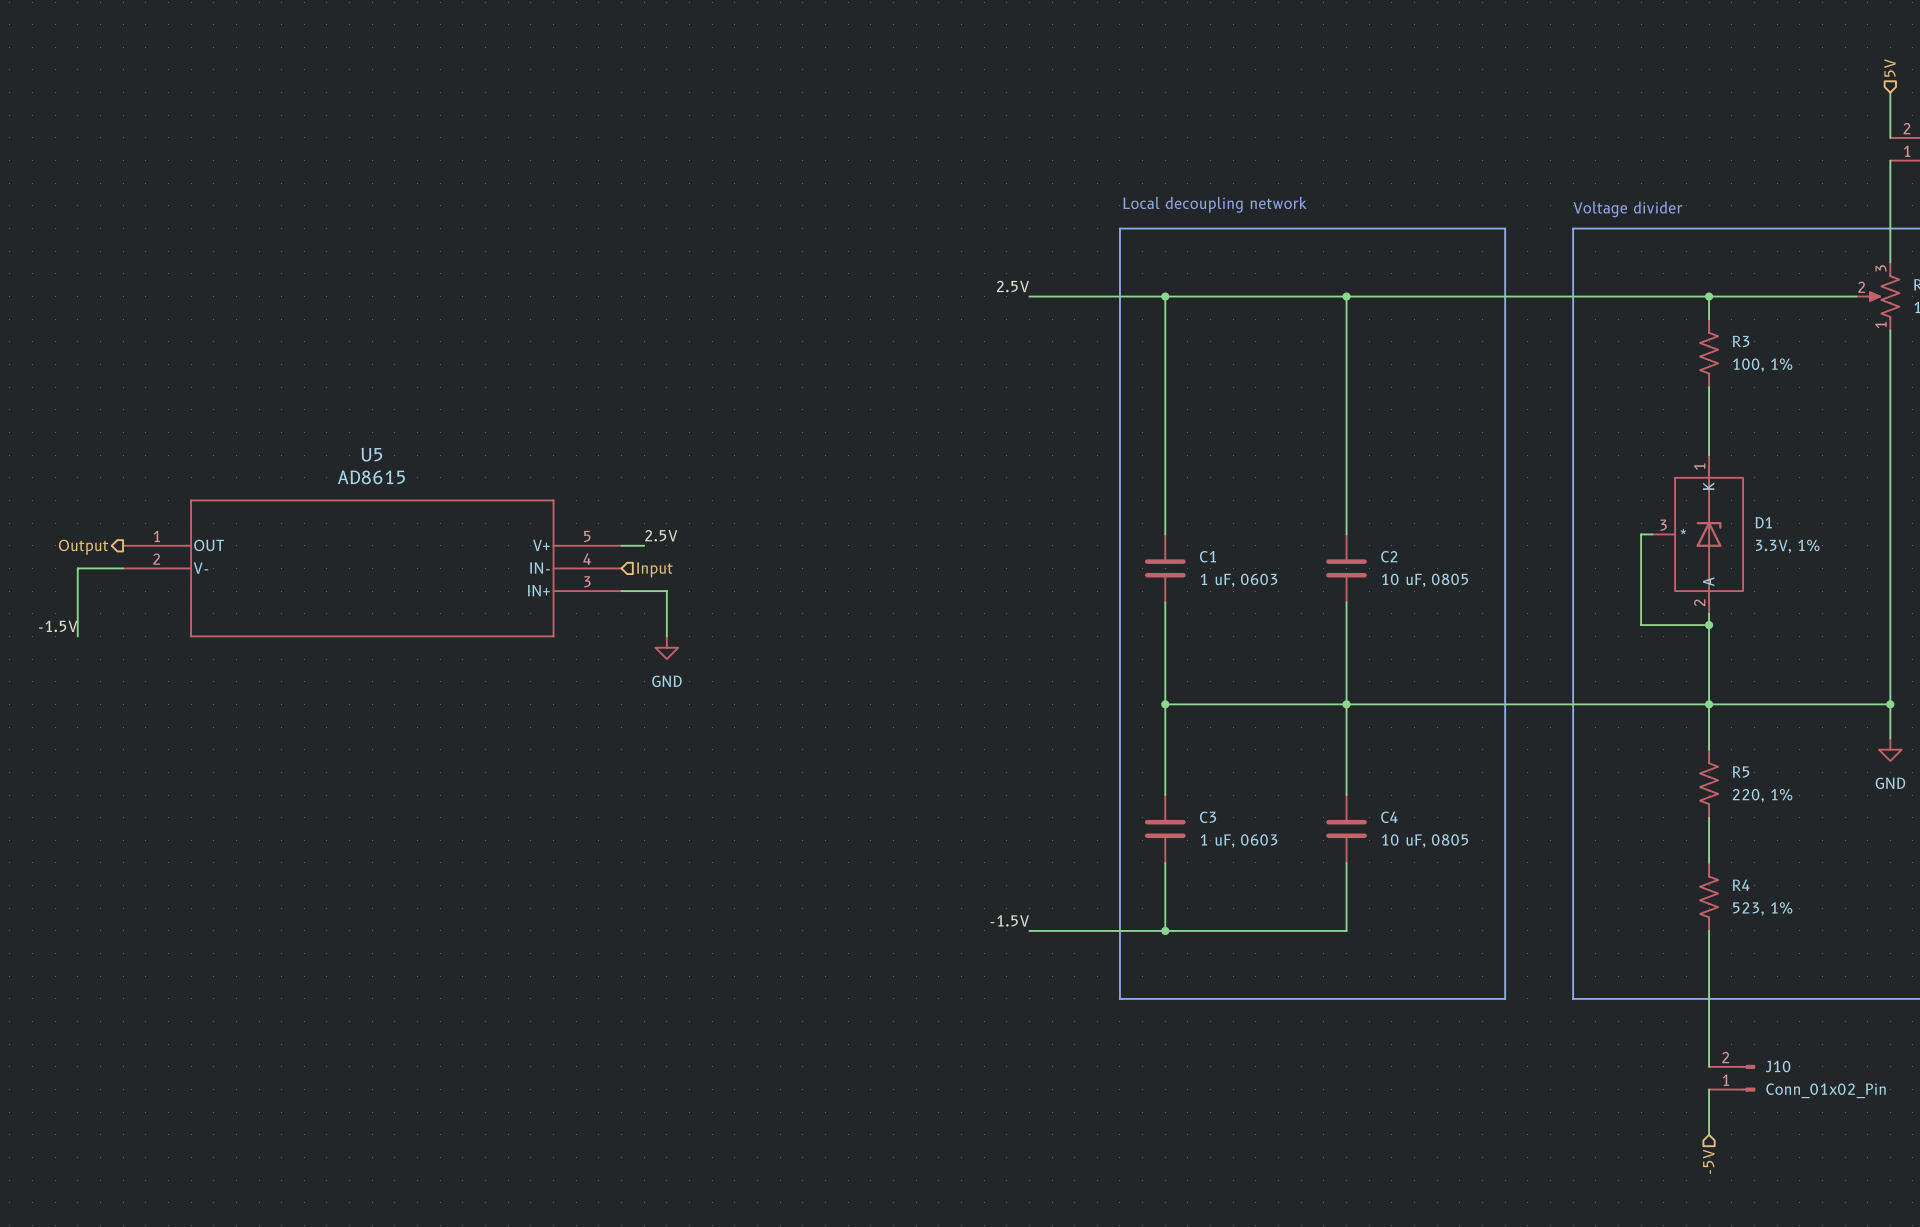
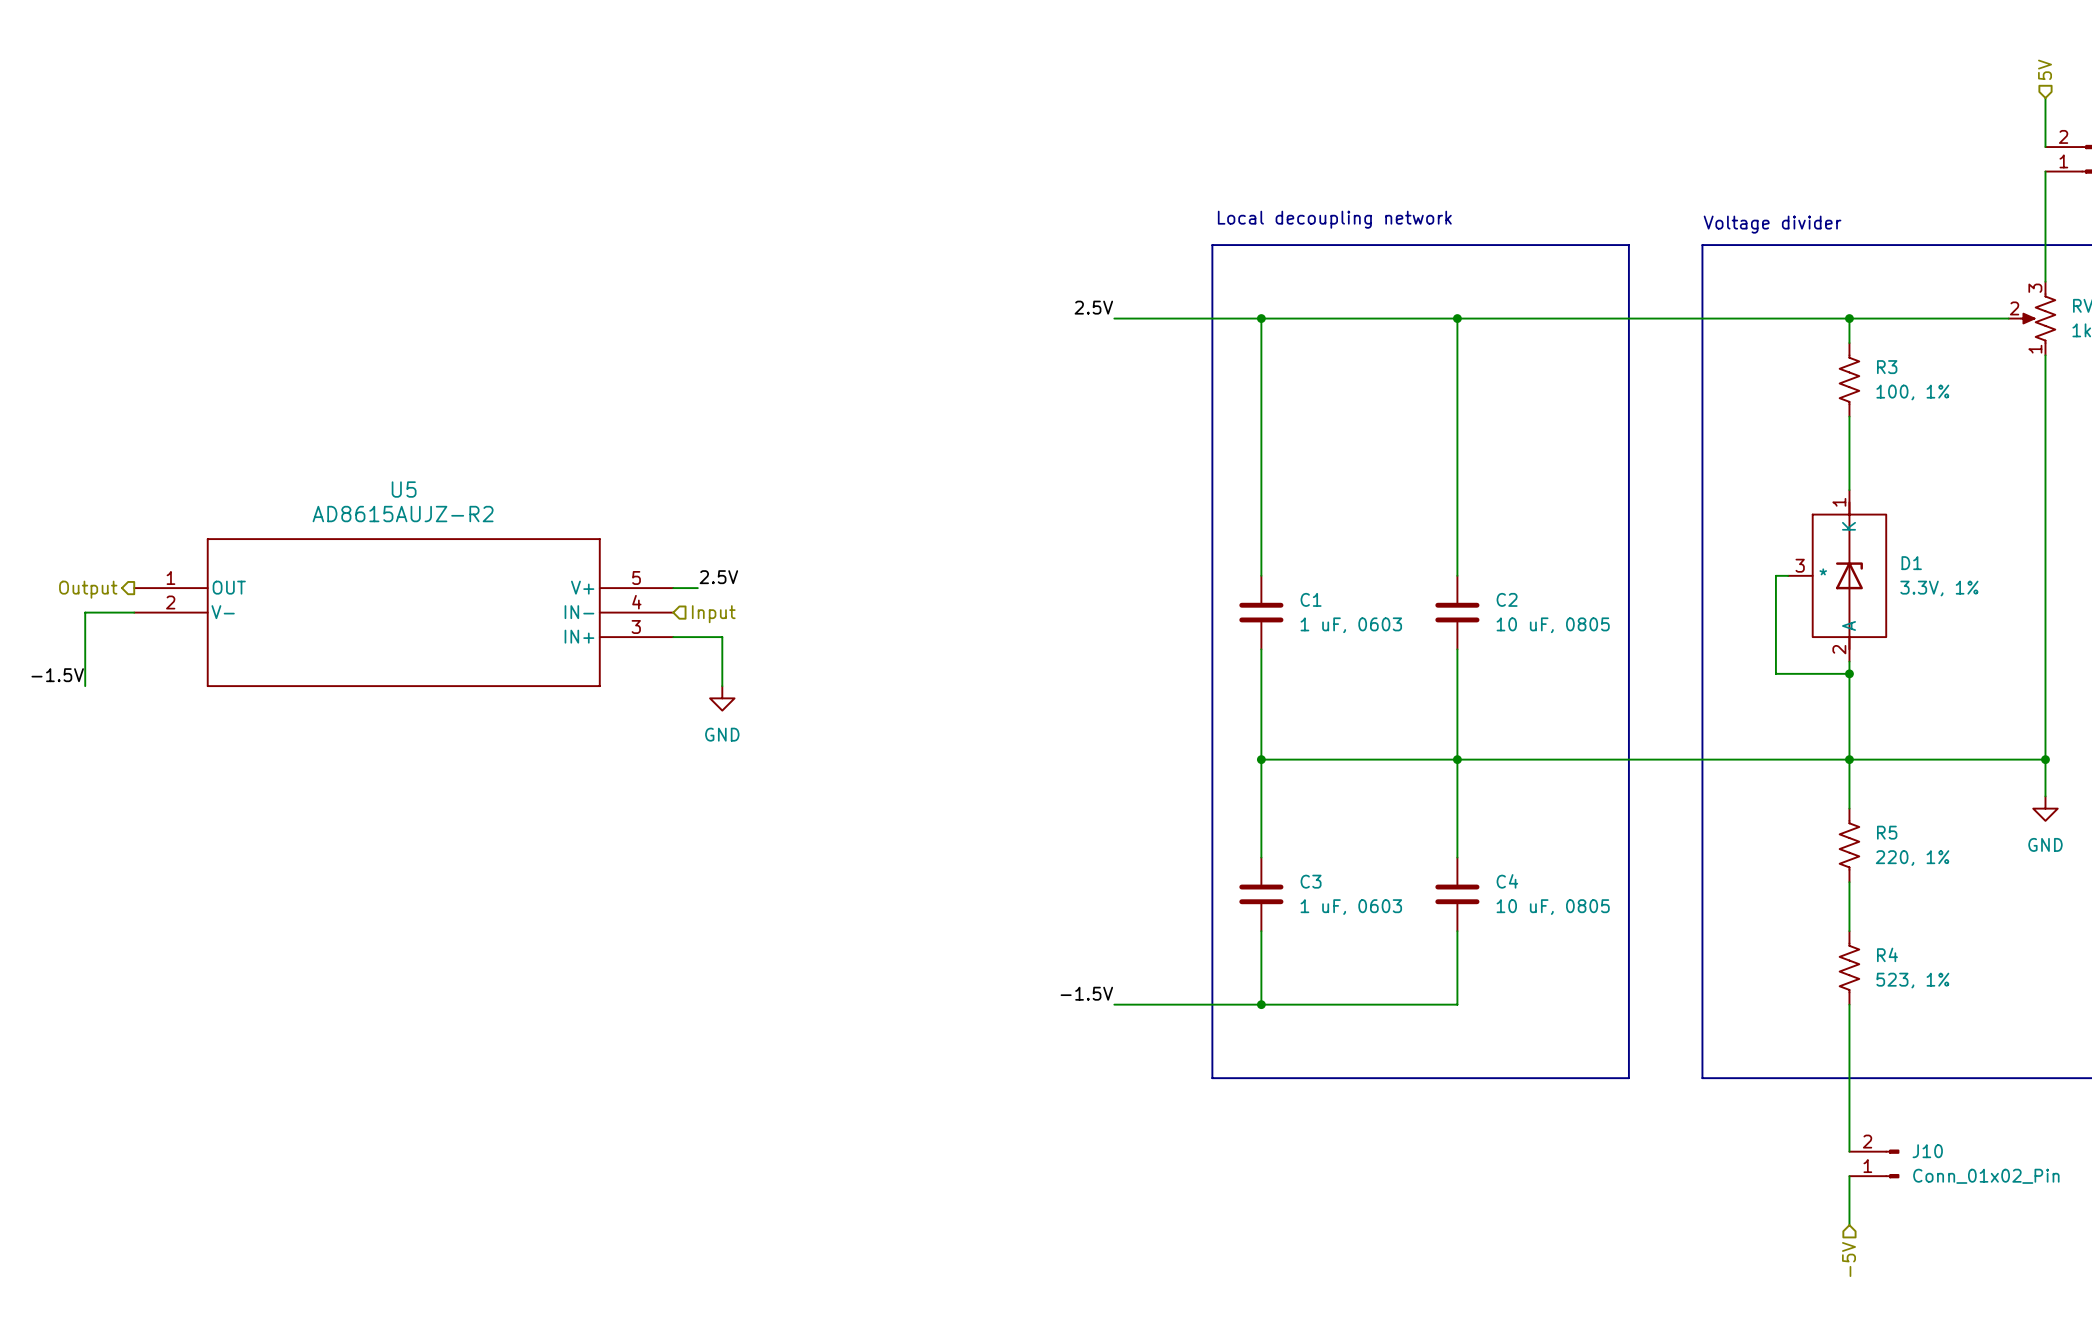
U5 value: AD8615 (371, 477) -> AD8615AUJZ-R2 (403, 514)

